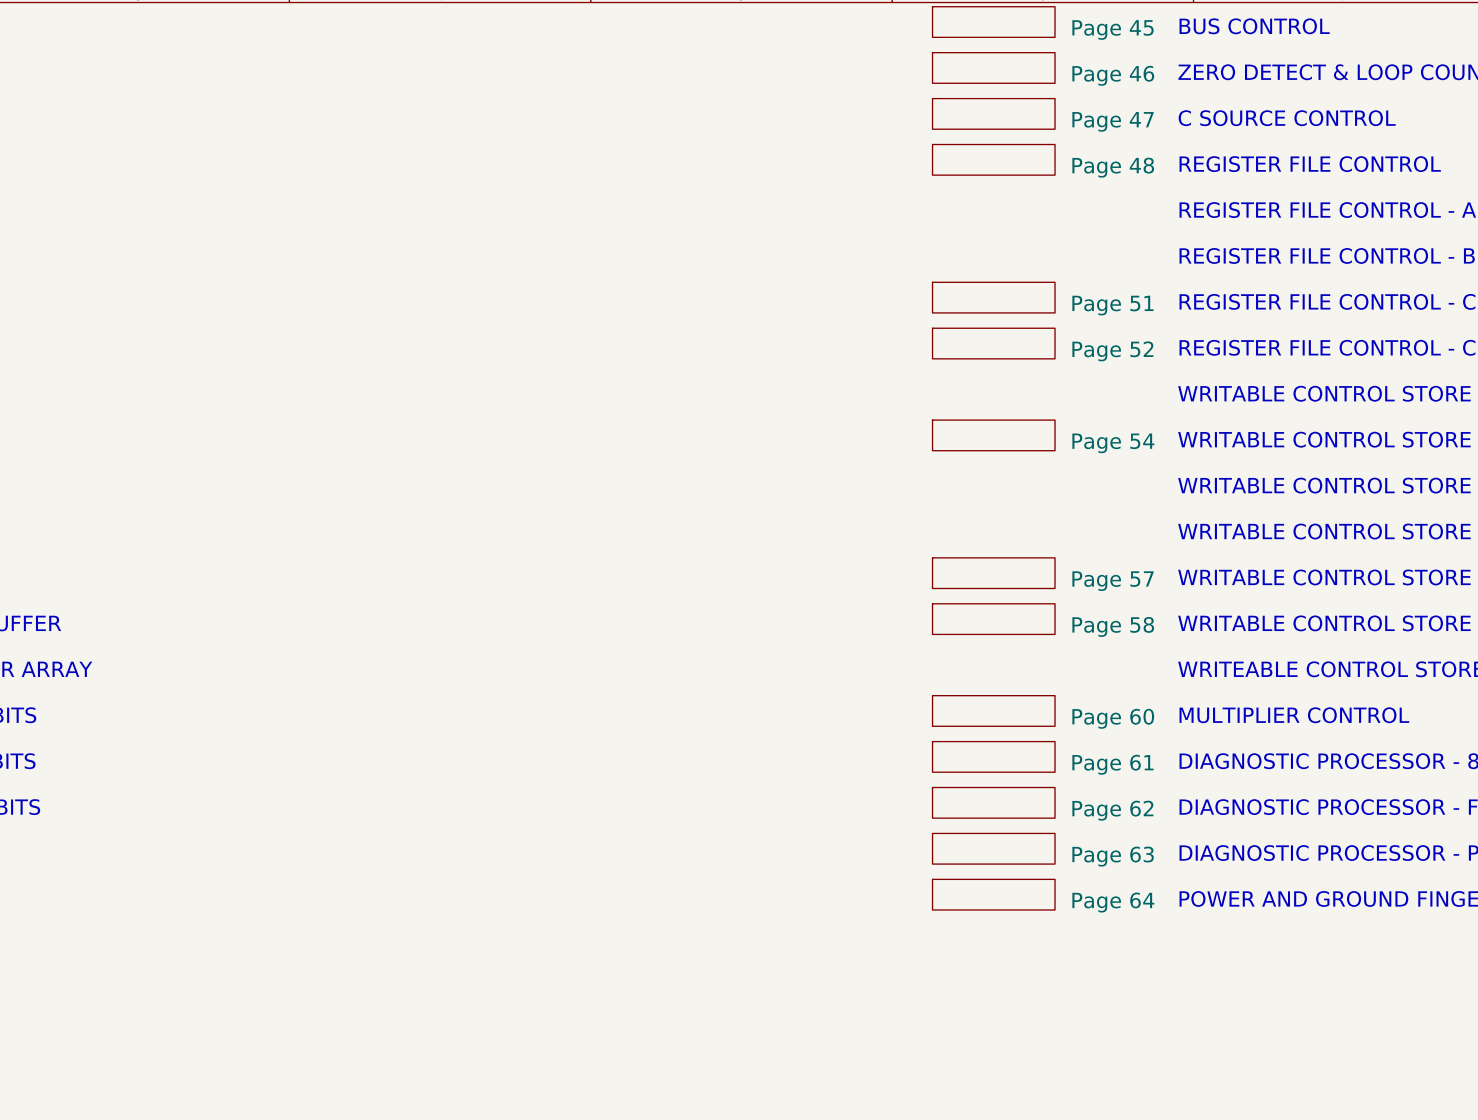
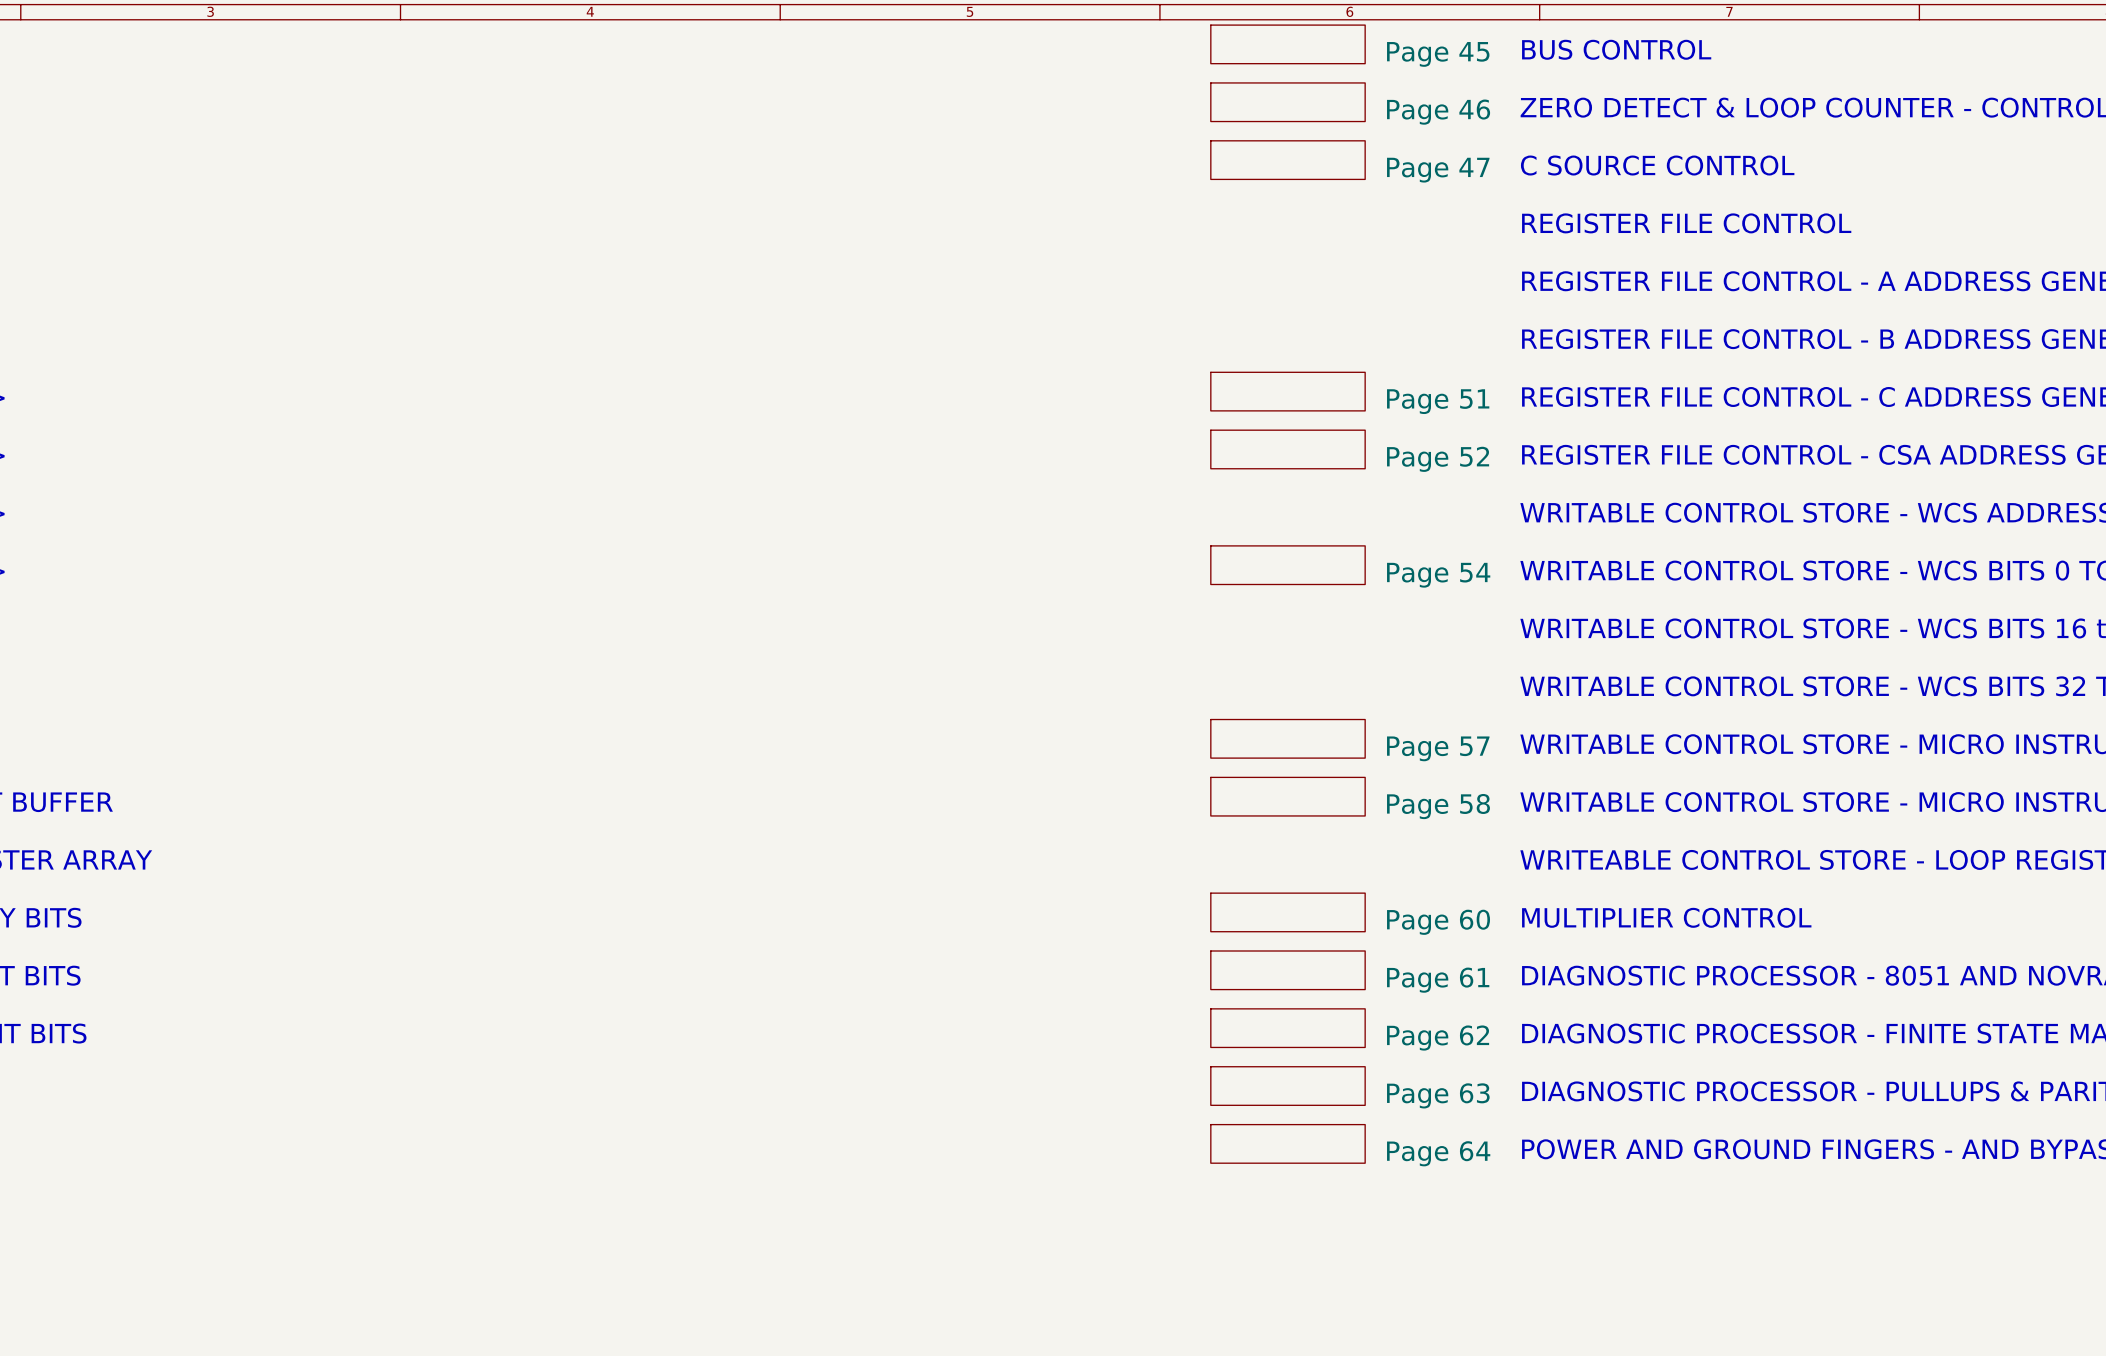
sheet Page 48: (993, 159) -> none

